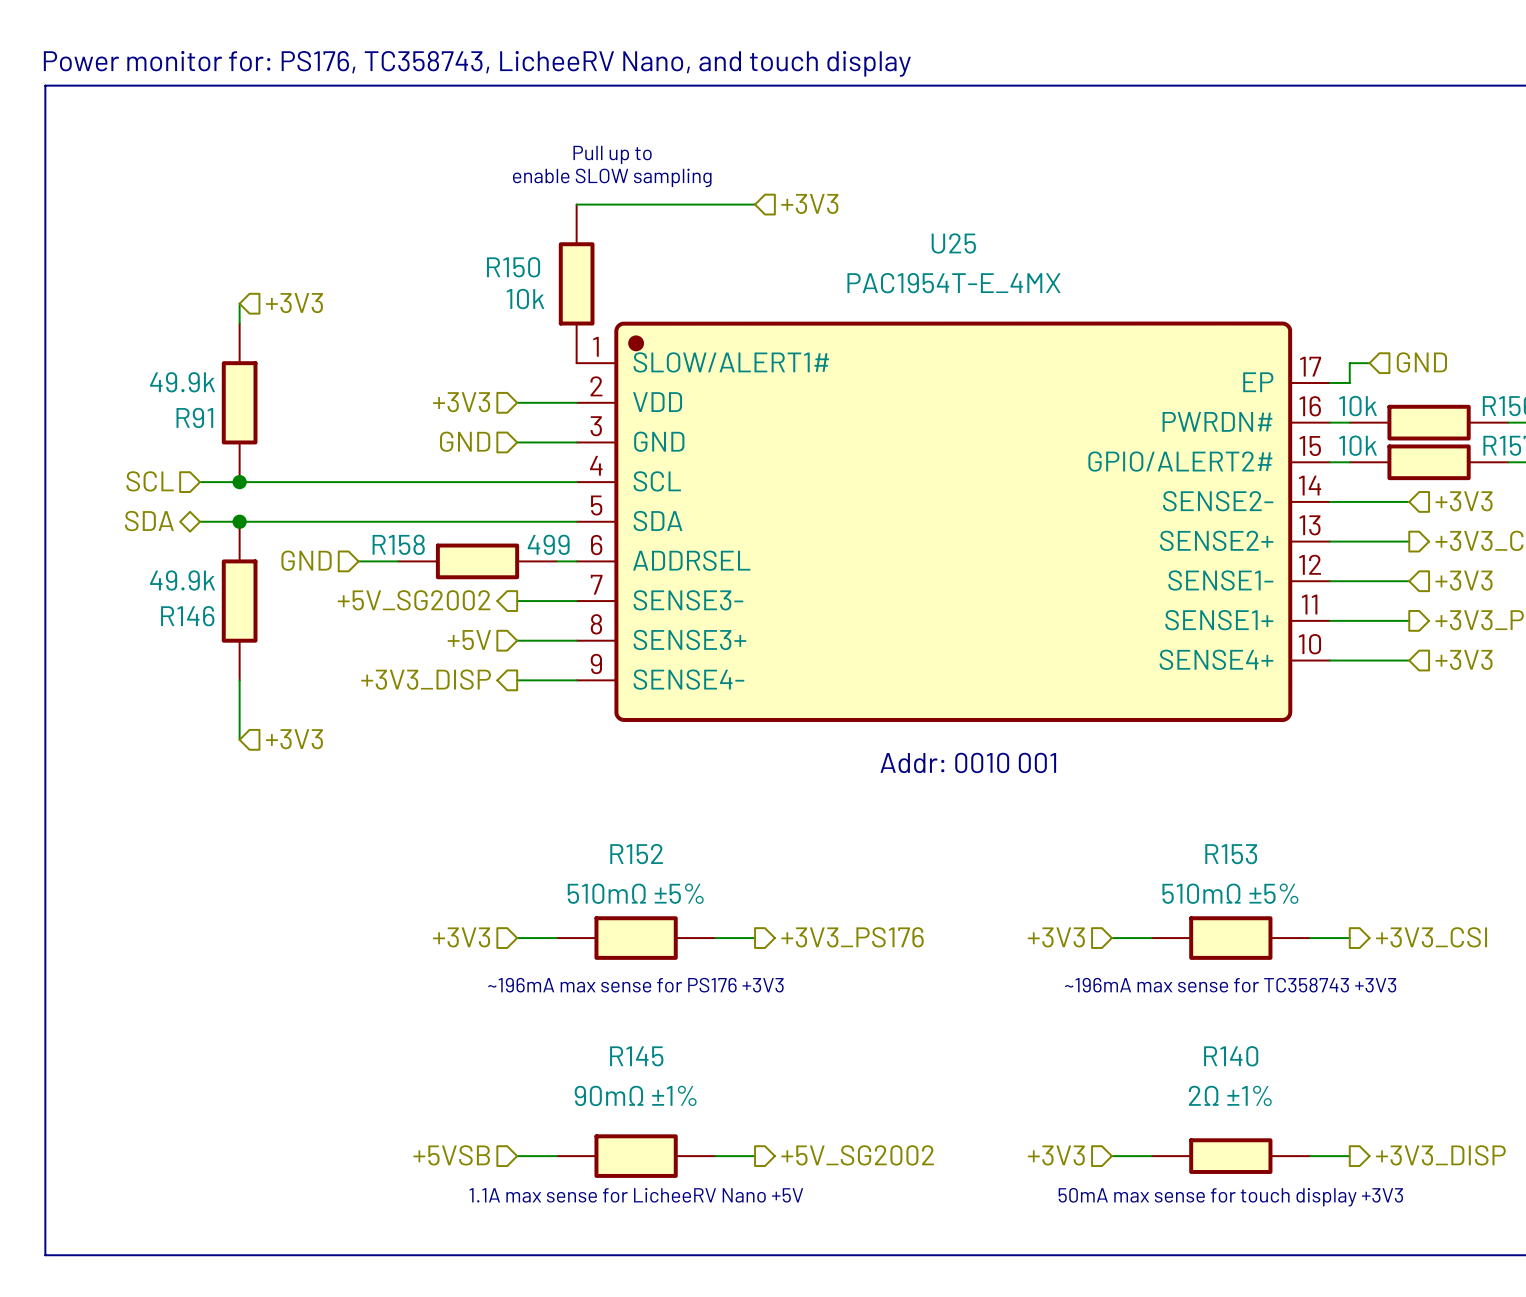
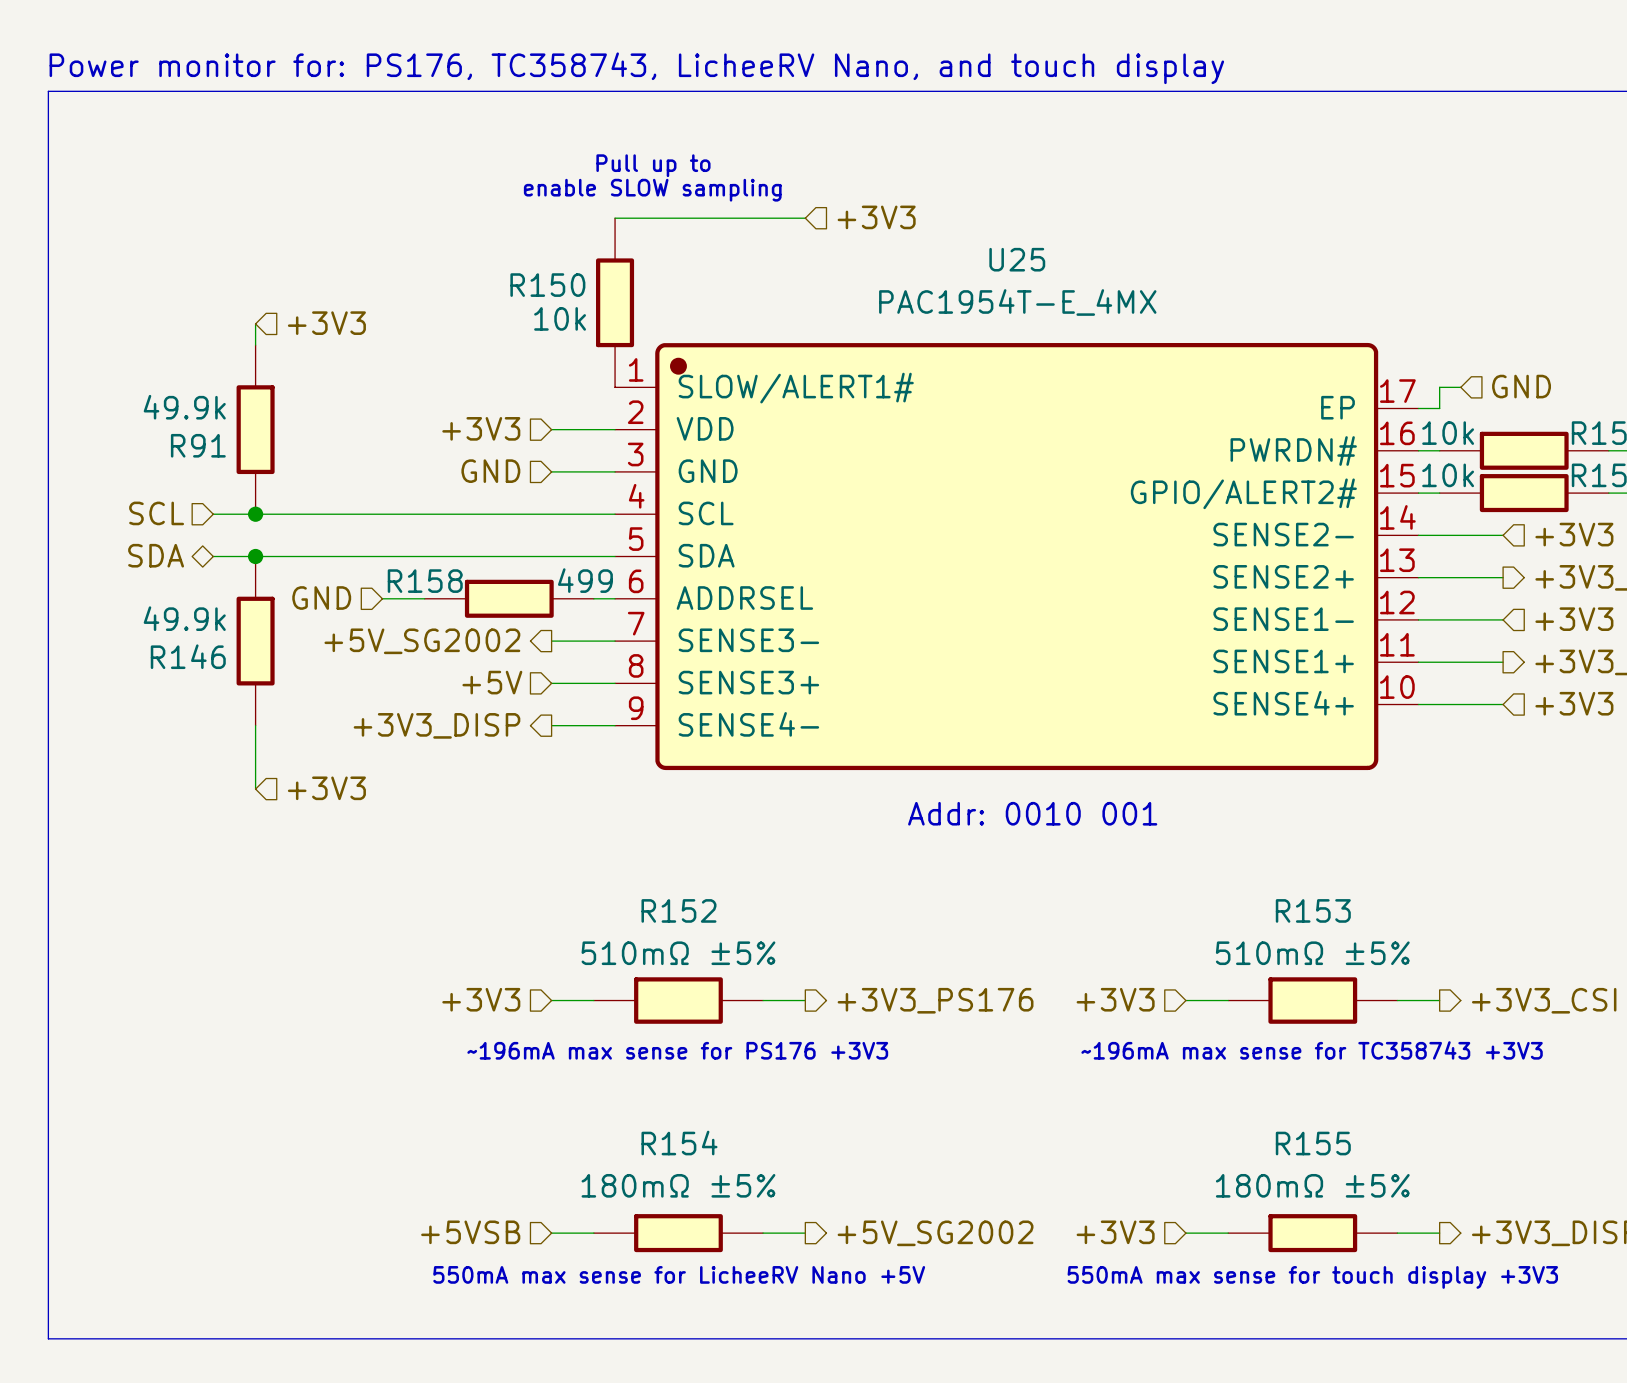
R140 name: R140 (1231, 1056) -> R155 (1313, 1143)
R140 value: 2Ω ±1% (1230, 1095) -> 180mΩ ±5% (1312, 1185)
R145: 90mΩ ±1% (636, 1156) -> none
R154: none -> 180mΩ ±5% (678, 1233)
text: 1.1A max sense for LicheeRV Nano +5V (636, 1195) -> 550mA max sense for LicheeRV Nano +5V (679, 1274)
text: 50mA max sense for touch display +3V3 (1230, 1197) -> 550mA max sense for touch display +3V3 (1312, 1277)

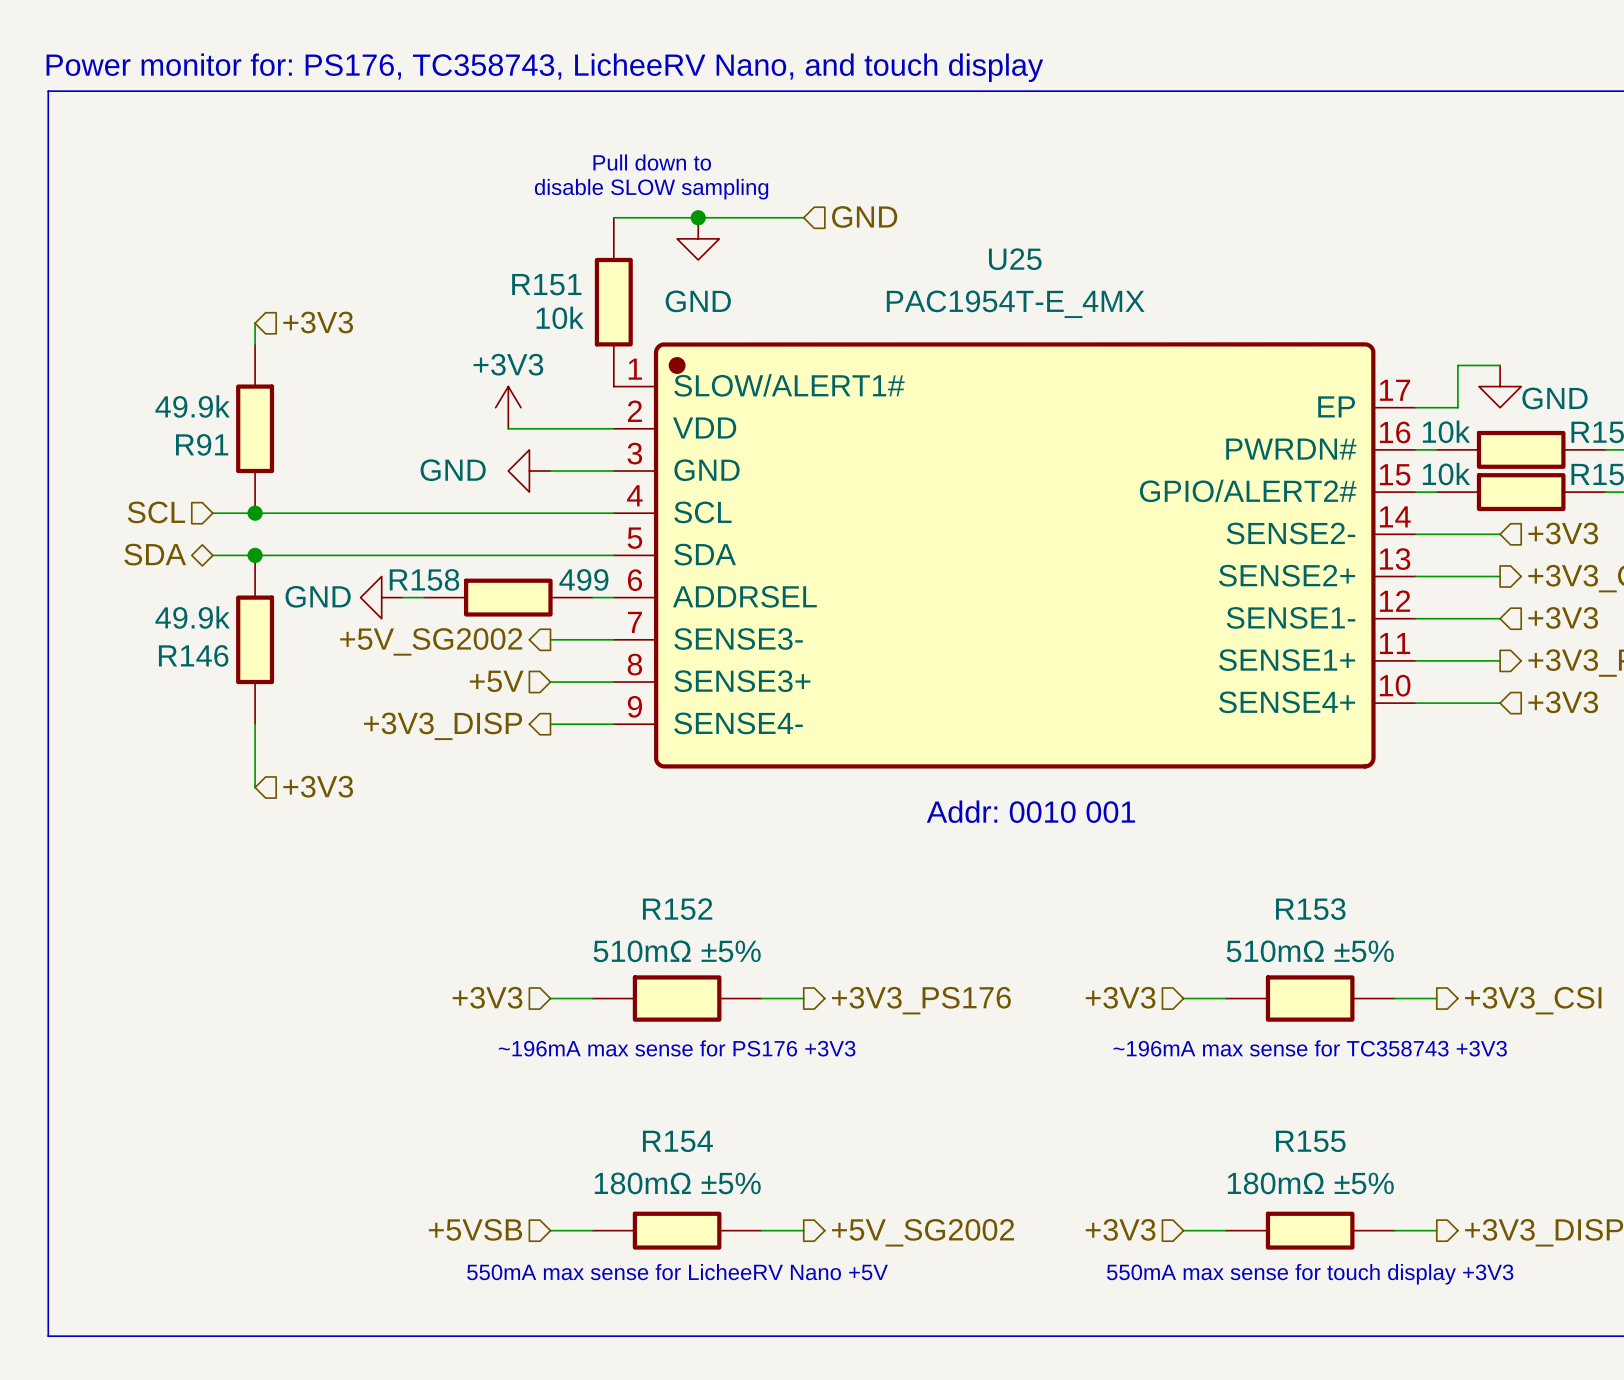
text: Pull up to (653, 165) -> Pull down to (652, 162)
text: enable SLOW sampling (652, 190) -> disable SLOW sampling (651, 189)
hierarchical label: +3V3 (876, 217) -> GND (864, 216)
junction: none -> (698, 217)
power symbol: none -> GND (698, 238)
R150 name: R150 (547, 285) -> R151 (546, 284)
hierarchical label: GND (1521, 386) -> none
wire: (1460, 387) (1439, 387) (1439, 408) -> (1500, 365) (1457, 365) (1457, 407) (1436, 407)
power symbol: none -> GND (1500, 386)
power symbol: none -> +3V3 (508, 407)
hierarchical label: +3V3 (481, 428) -> none
wire: none -> (508, 428) (550, 428)
hierarchical label: GND (490, 471) -> none
power symbol: none -> GND (529, 470)
hierarchical label: GND (321, 598) -> none
power symbol: none -> GND (381, 597)

